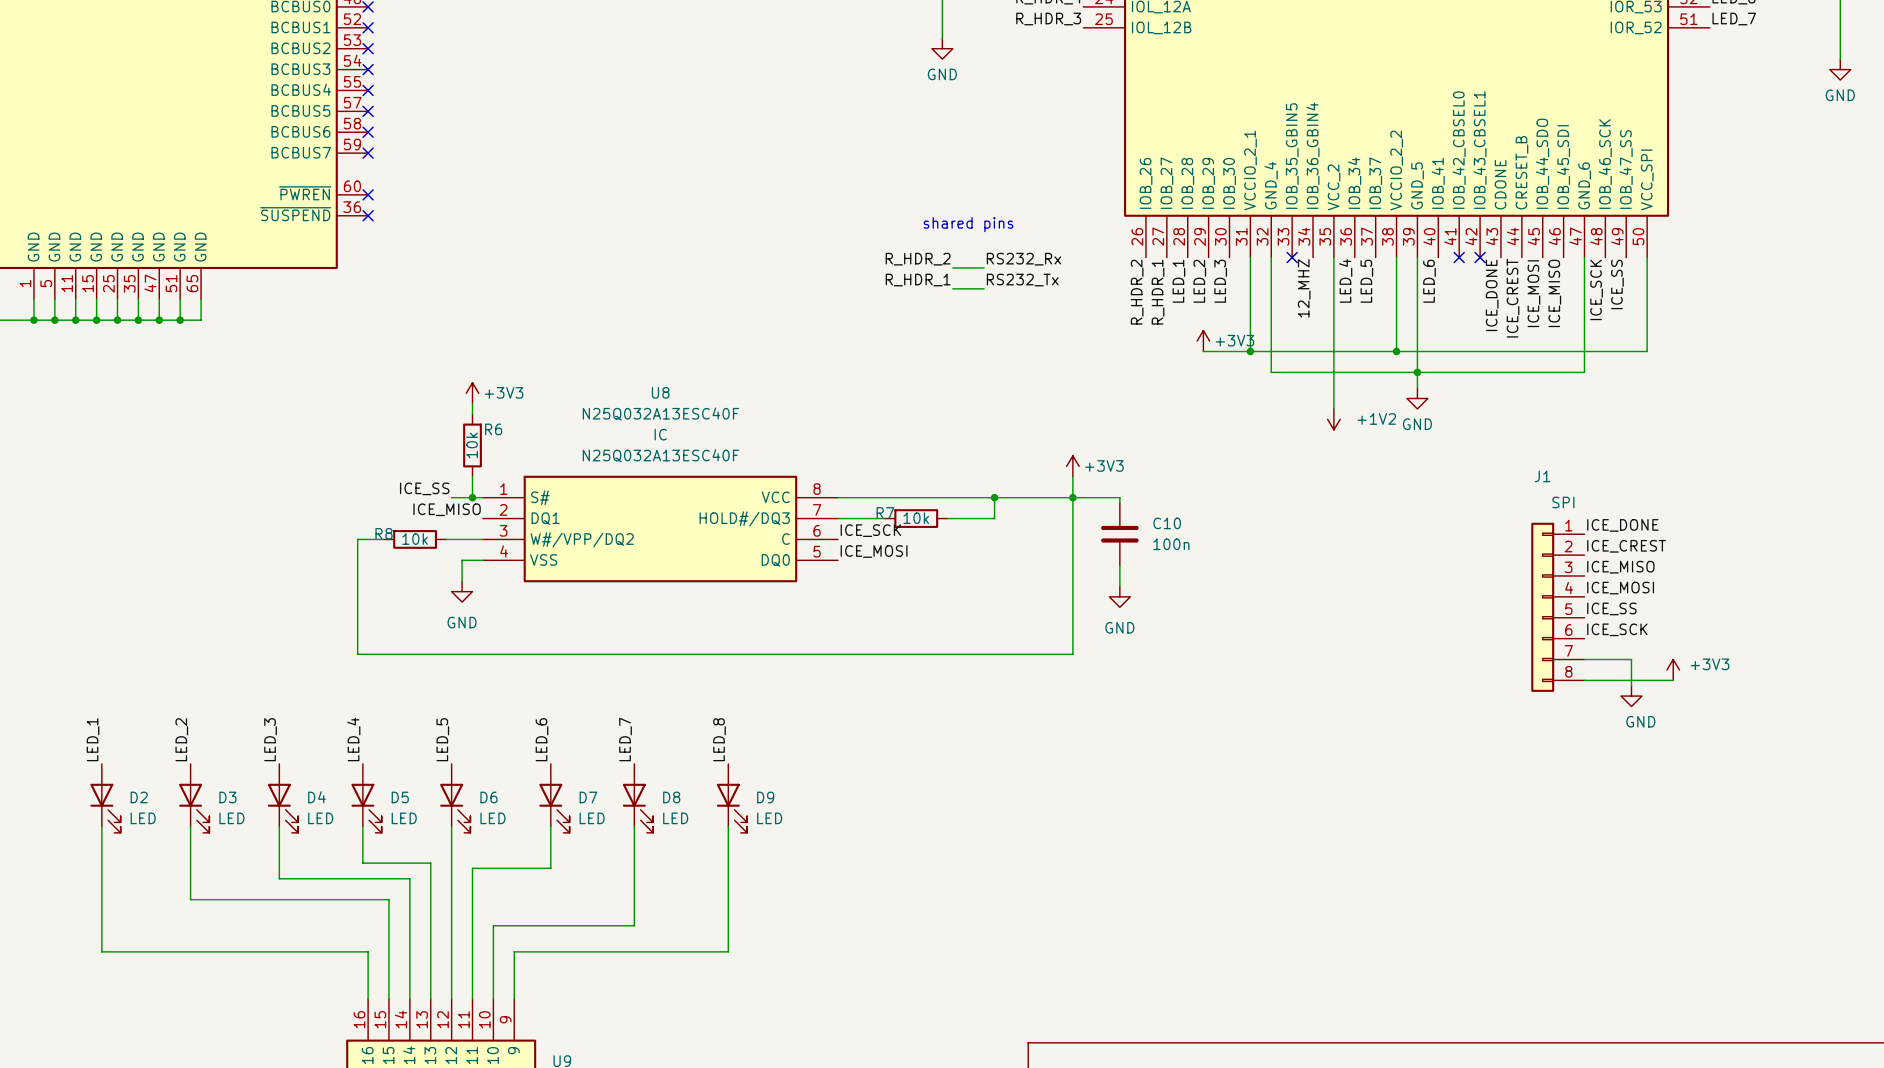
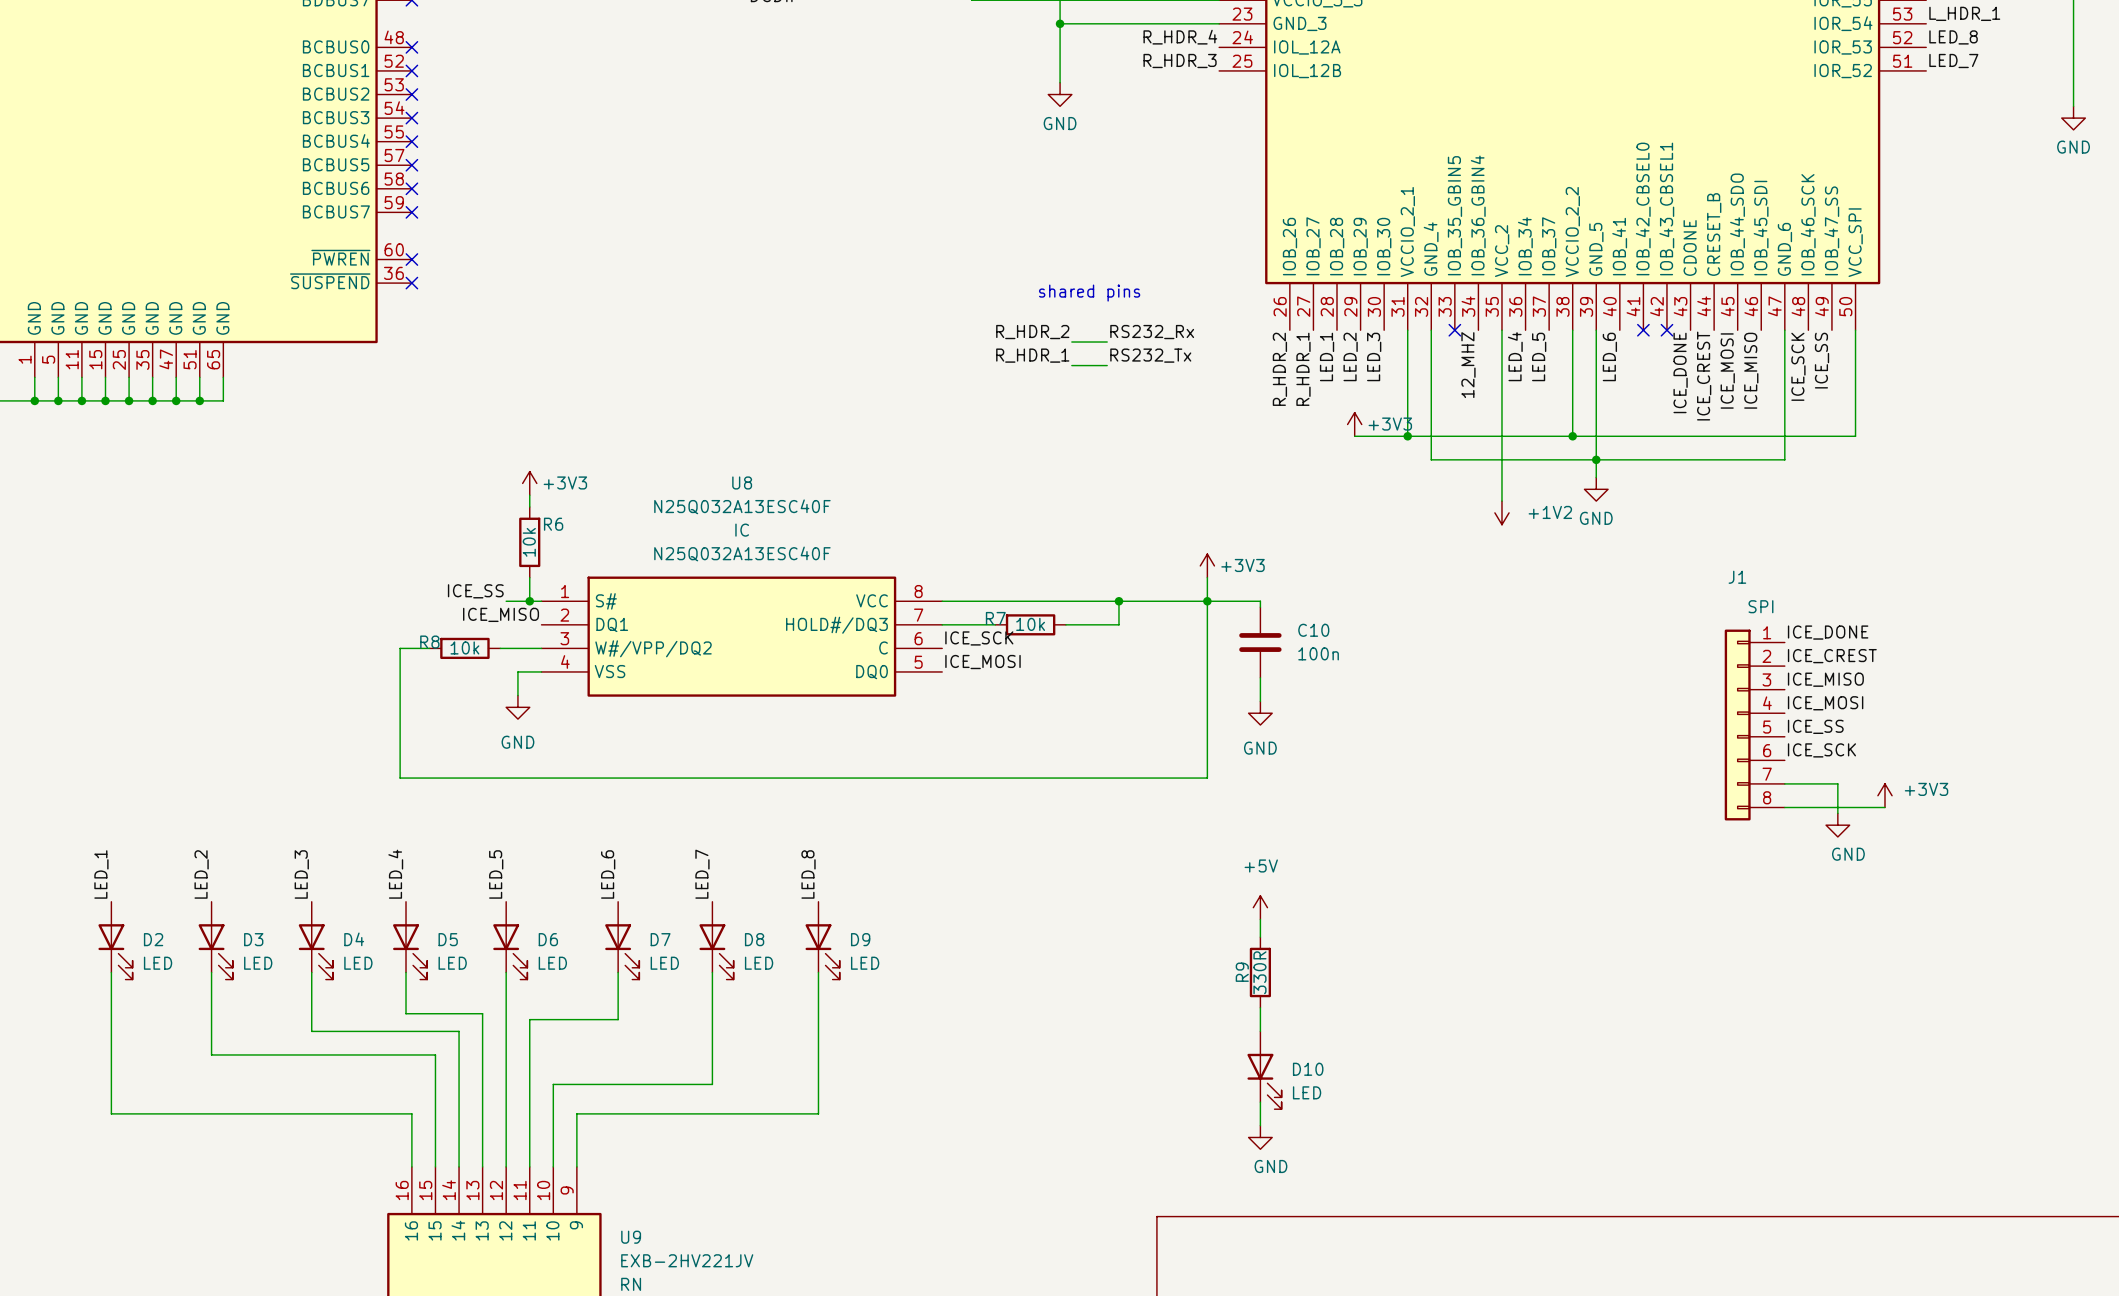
power symbol: none -> +5V (1260, 907)
wire: none -> (1260, 919) (1260, 937)
R9: none -> 330R (1260, 972)
wire: none -> (1260, 1007) (1260, 1031)
D10: none -> LED (1264, 1070)
wire: none -> (1260, 1102) (1260, 1125)
power symbol: none -> GND (1260, 1137)

